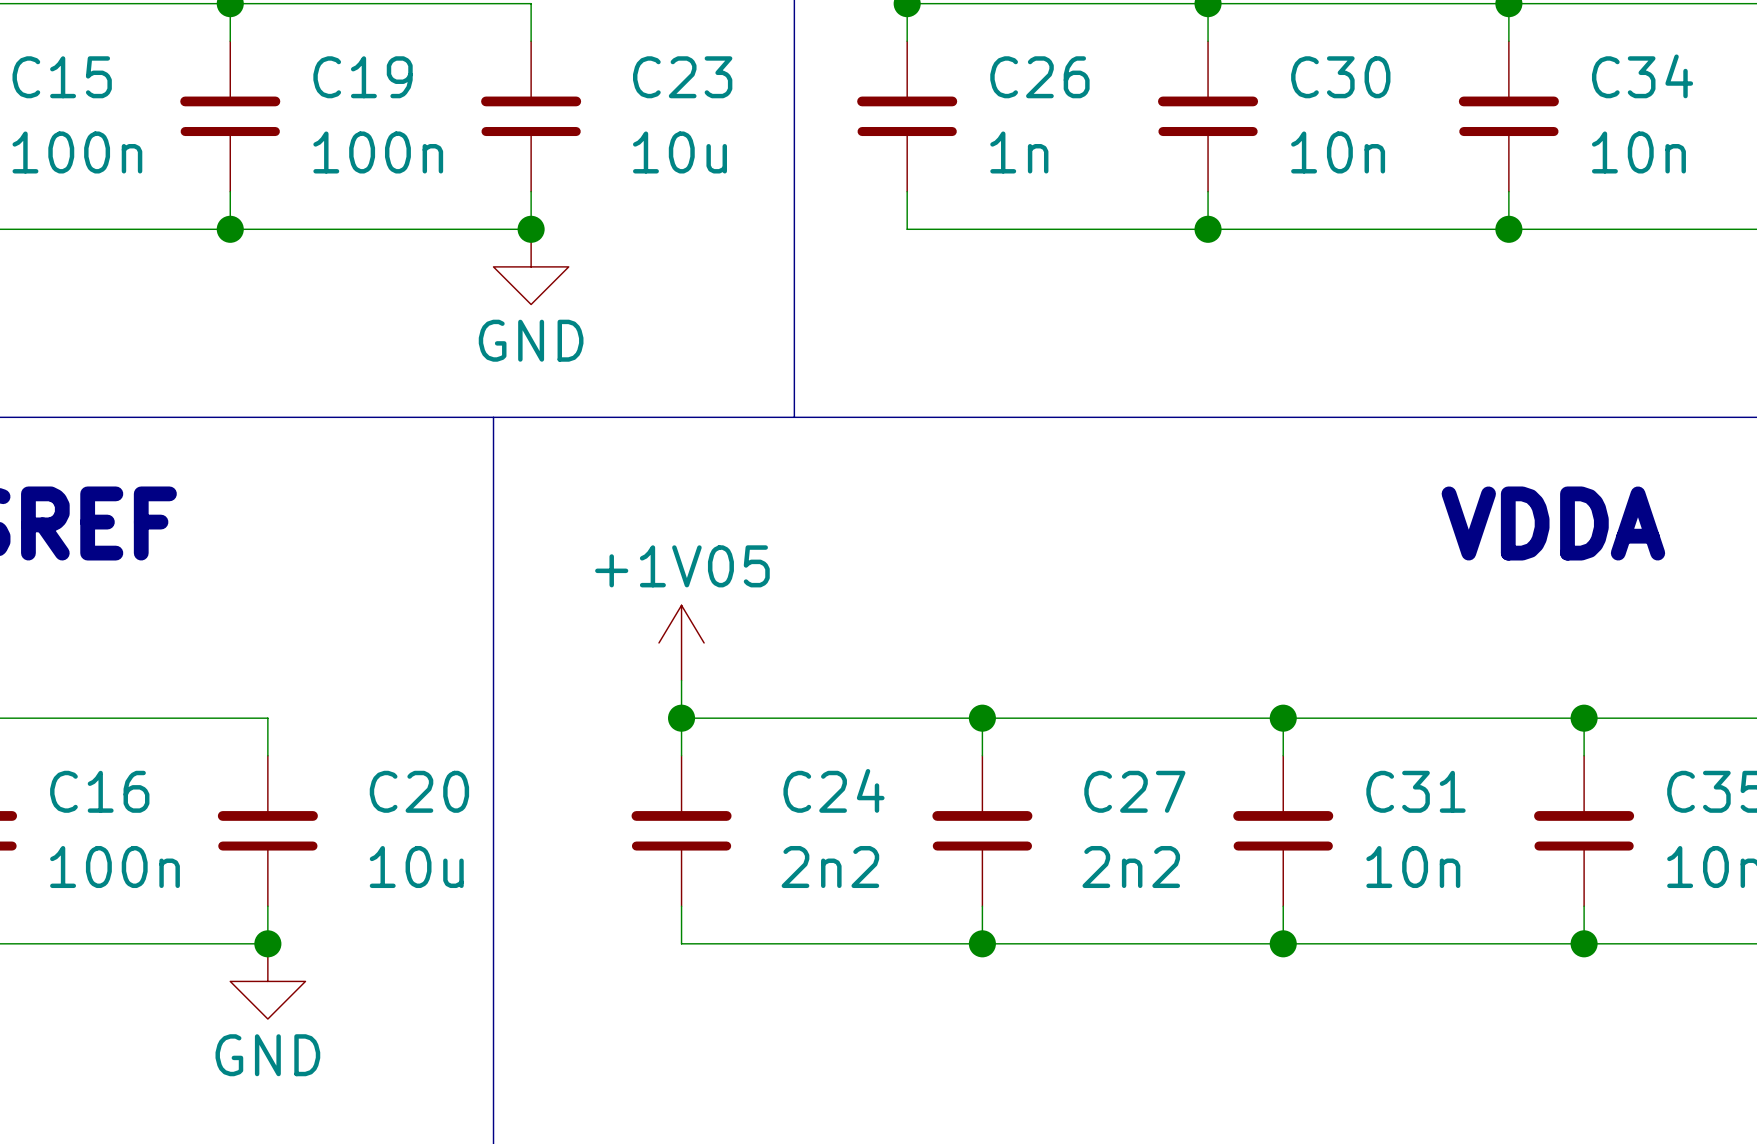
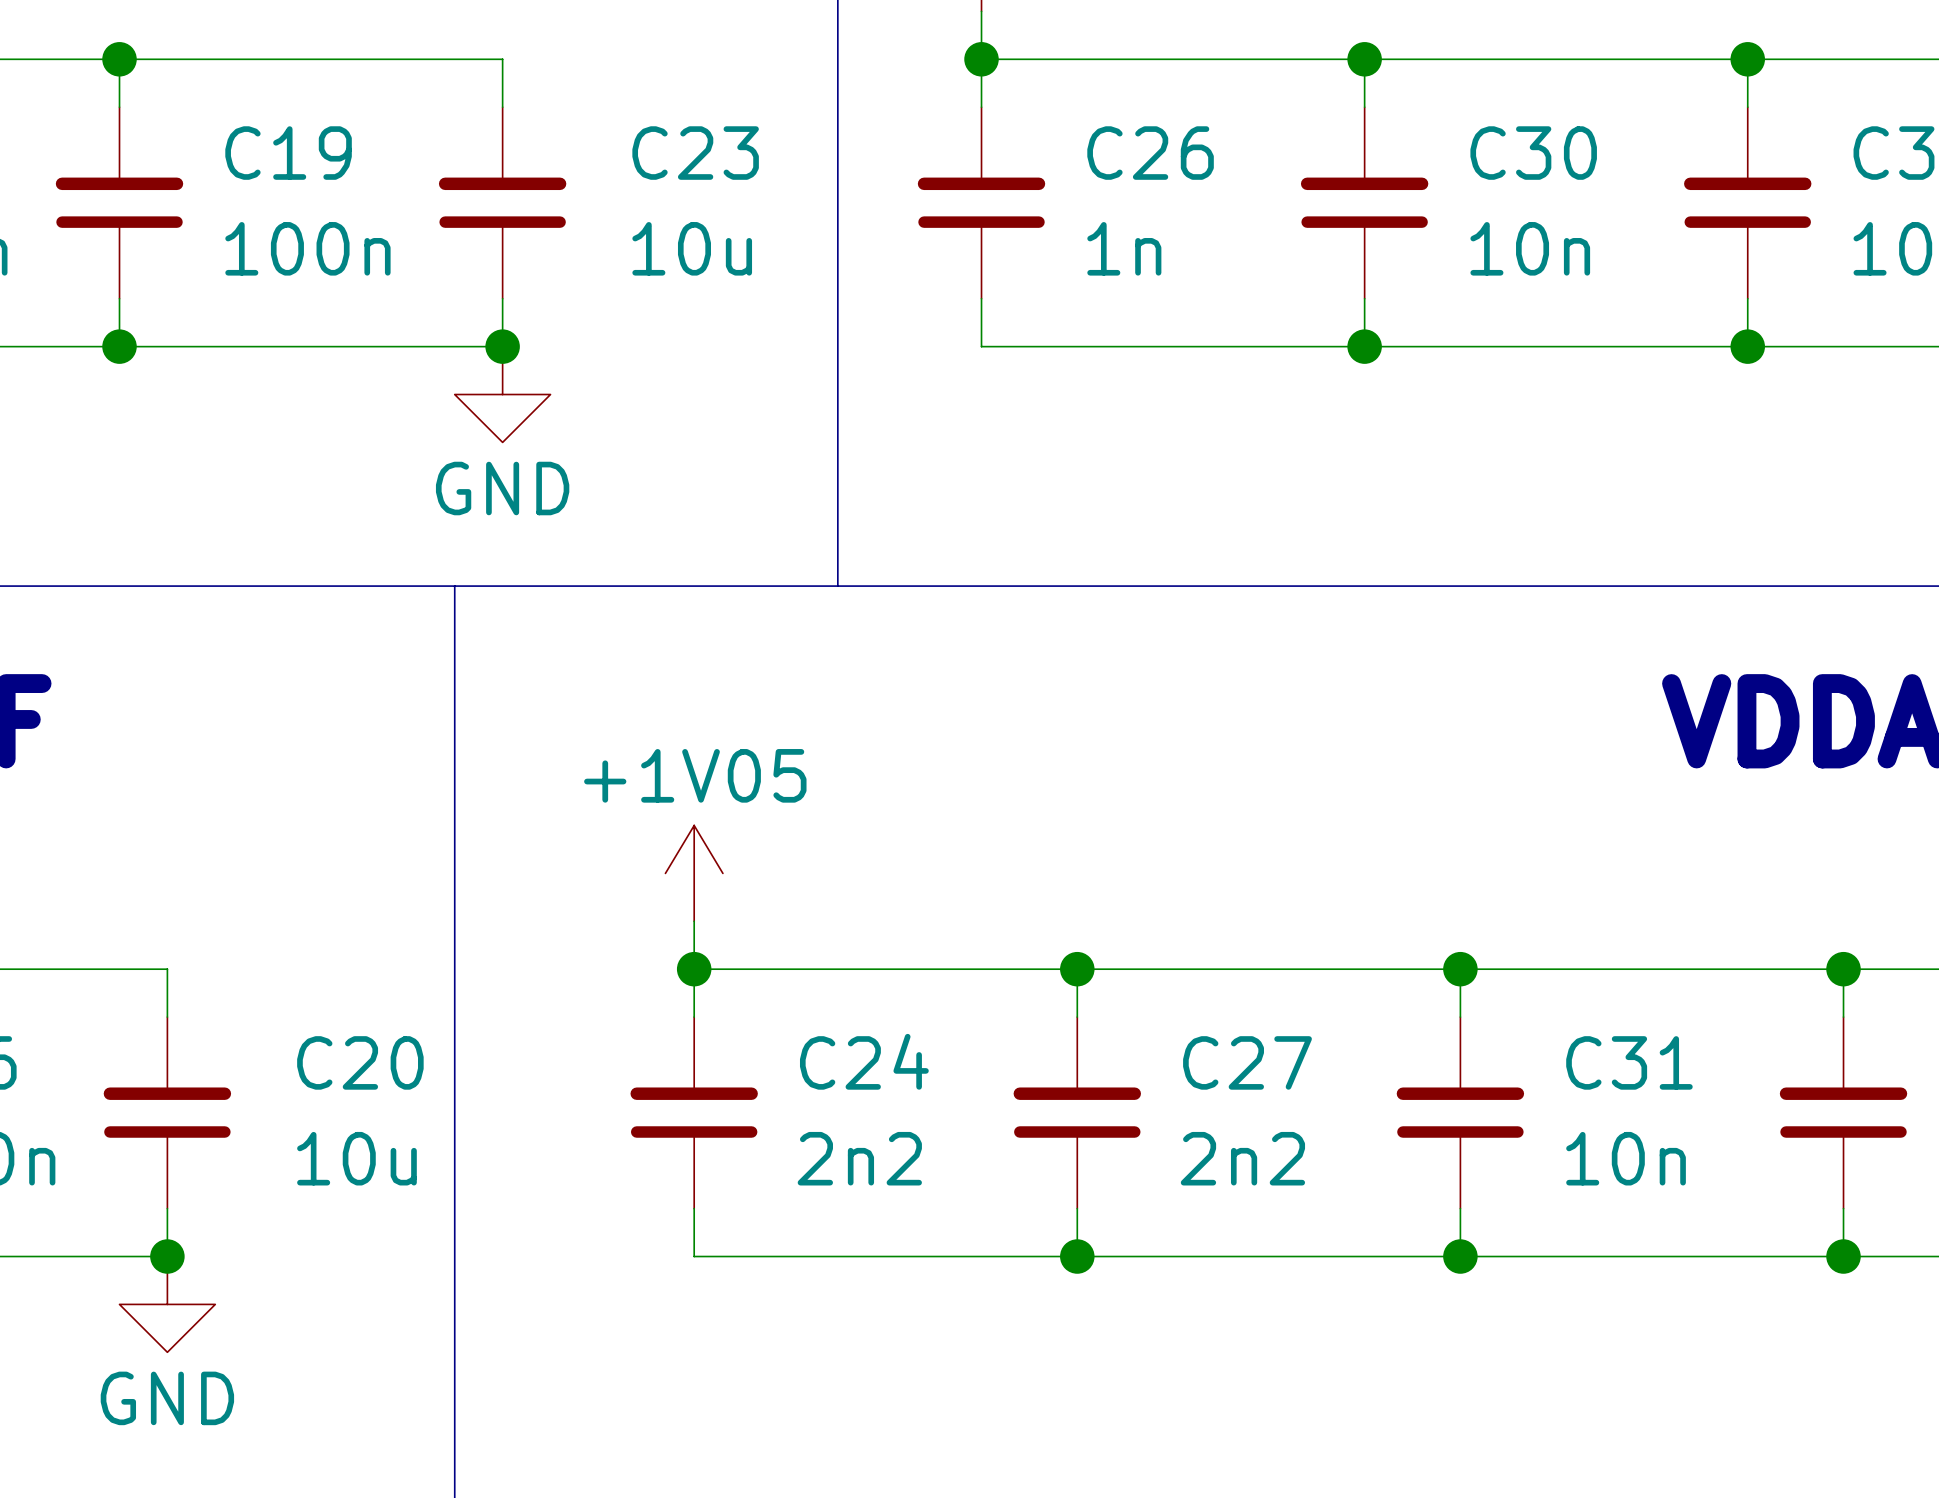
C24 name position: C24 (833, 790) -> C24 (864, 1061)
C27 name position: C27 (1134, 791) -> C27 (1247, 1062)
C24 text position: 2n2 (830, 867) -> 2n2 (859, 1158)
C27 text position: 2n2 (1131, 867) -> 2n2 (1242, 1158)

